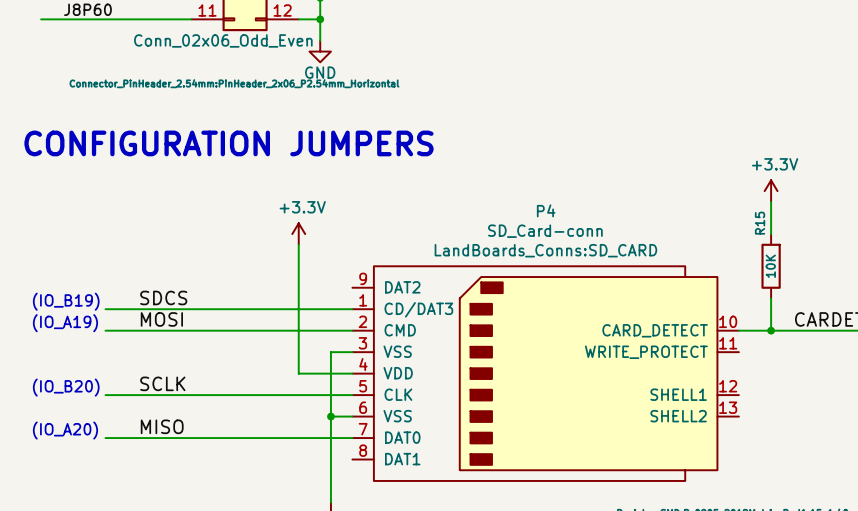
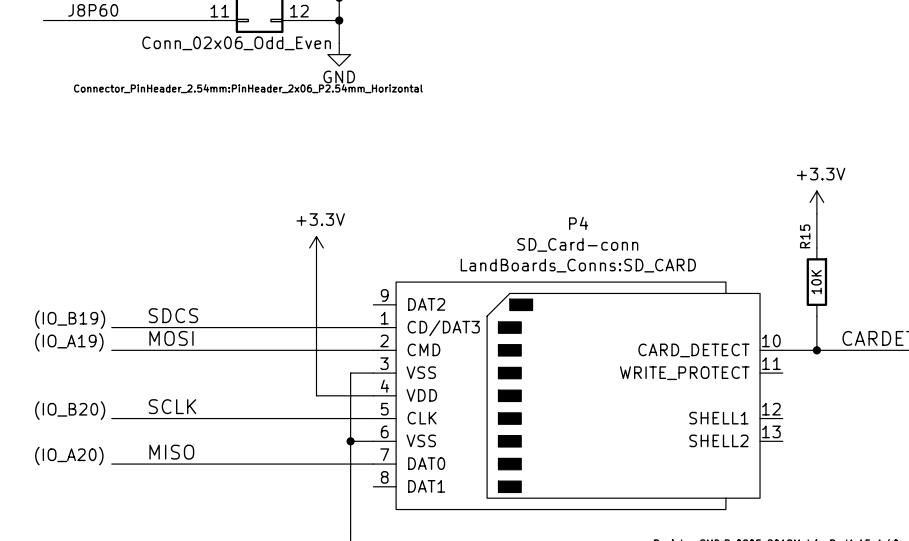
text: CONFIGURATION JUMPERS (228, 143) -> none

